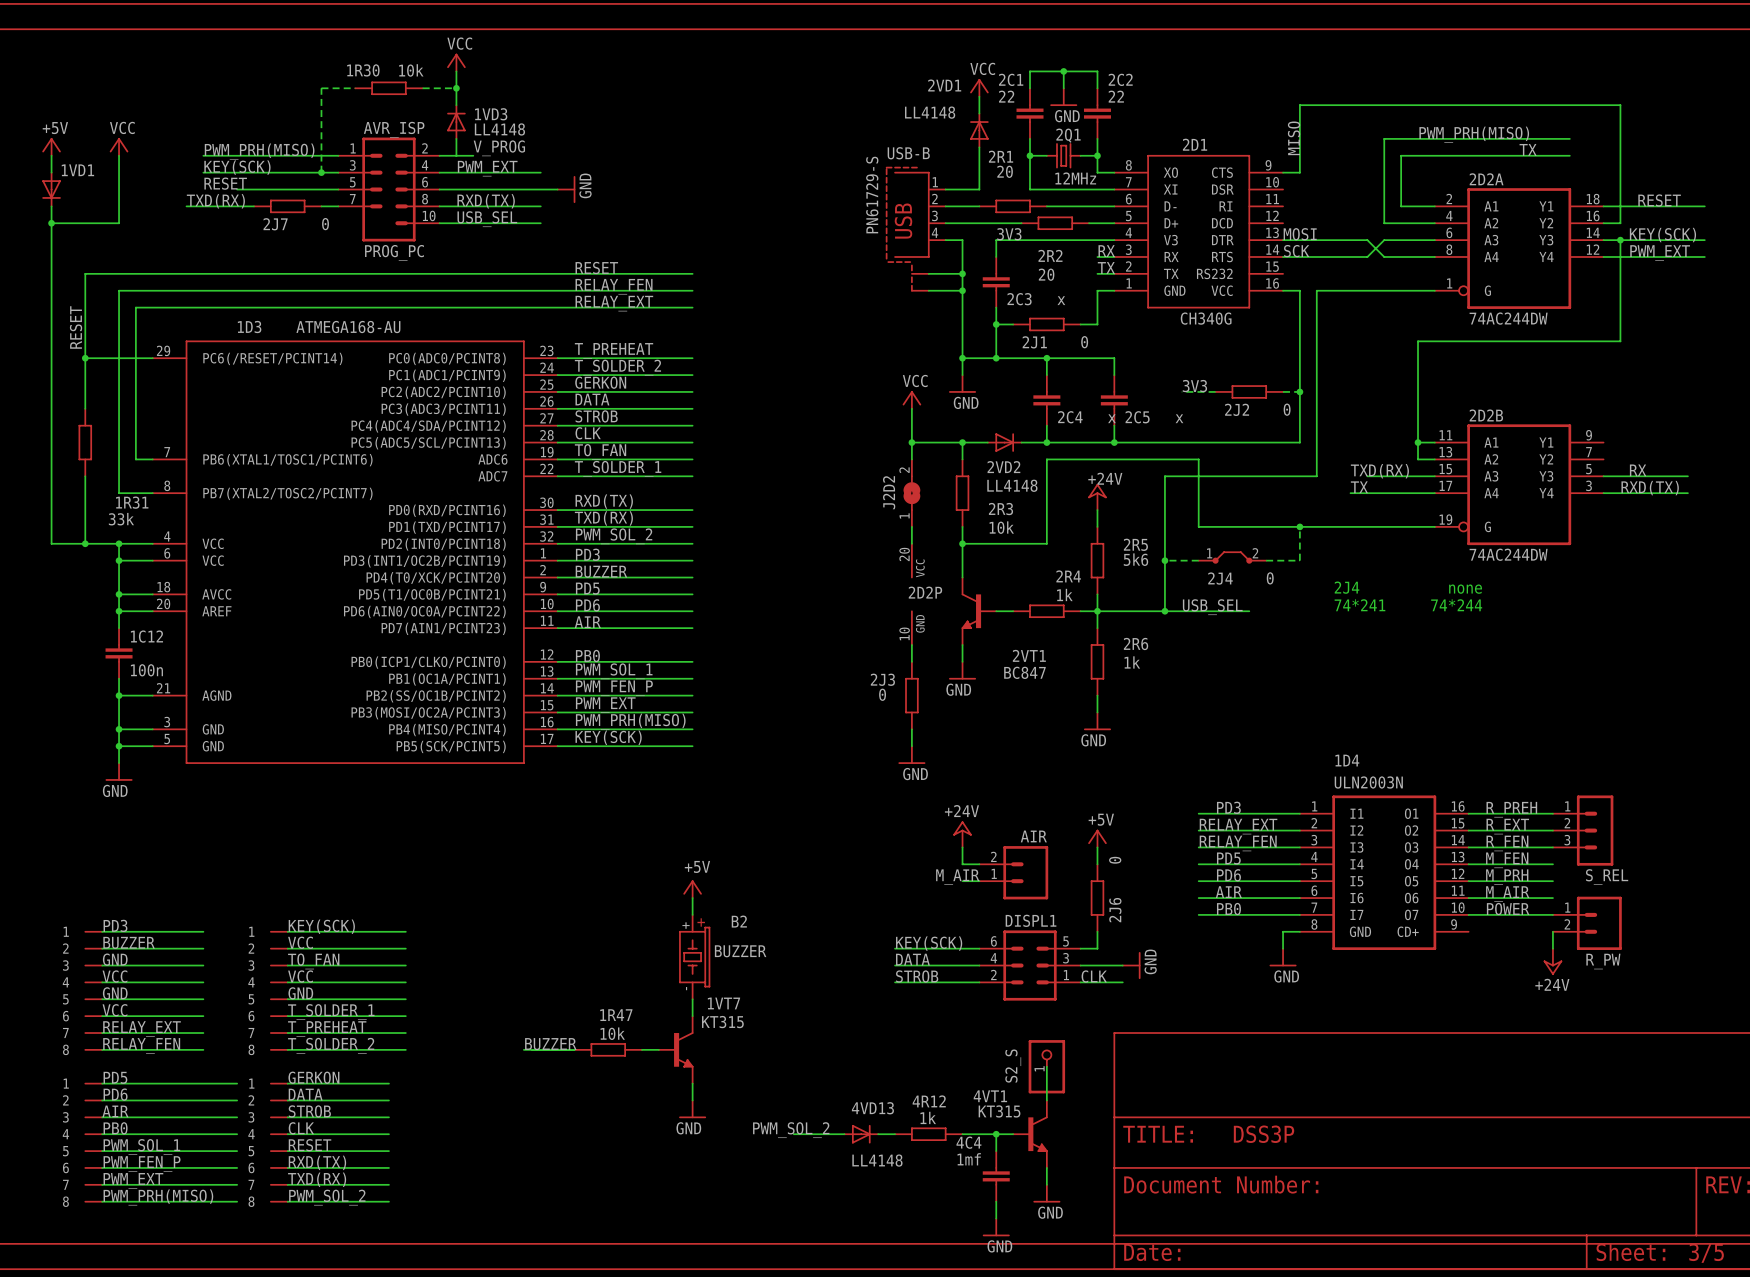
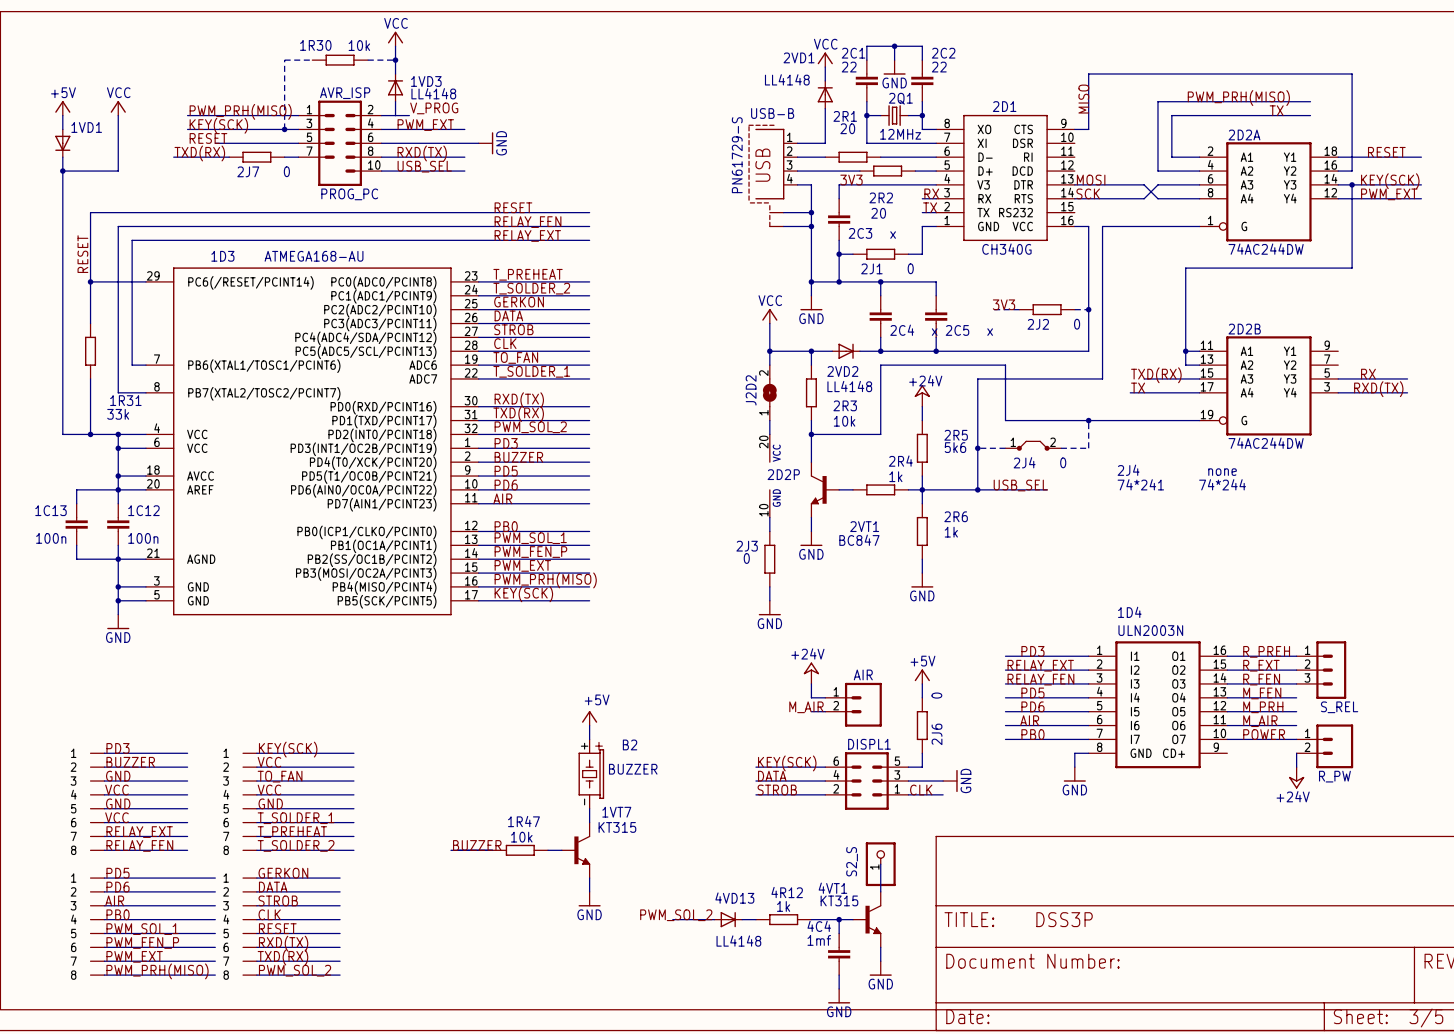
wire: none -> (118, 489) (76, 489) (76, 503)
1C13: none -> 100n (76, 524)
wire: none -> (76, 545) (76, 559) (118, 559)
AIR flip: as is (1025, 872) -> up-down (863, 704)

